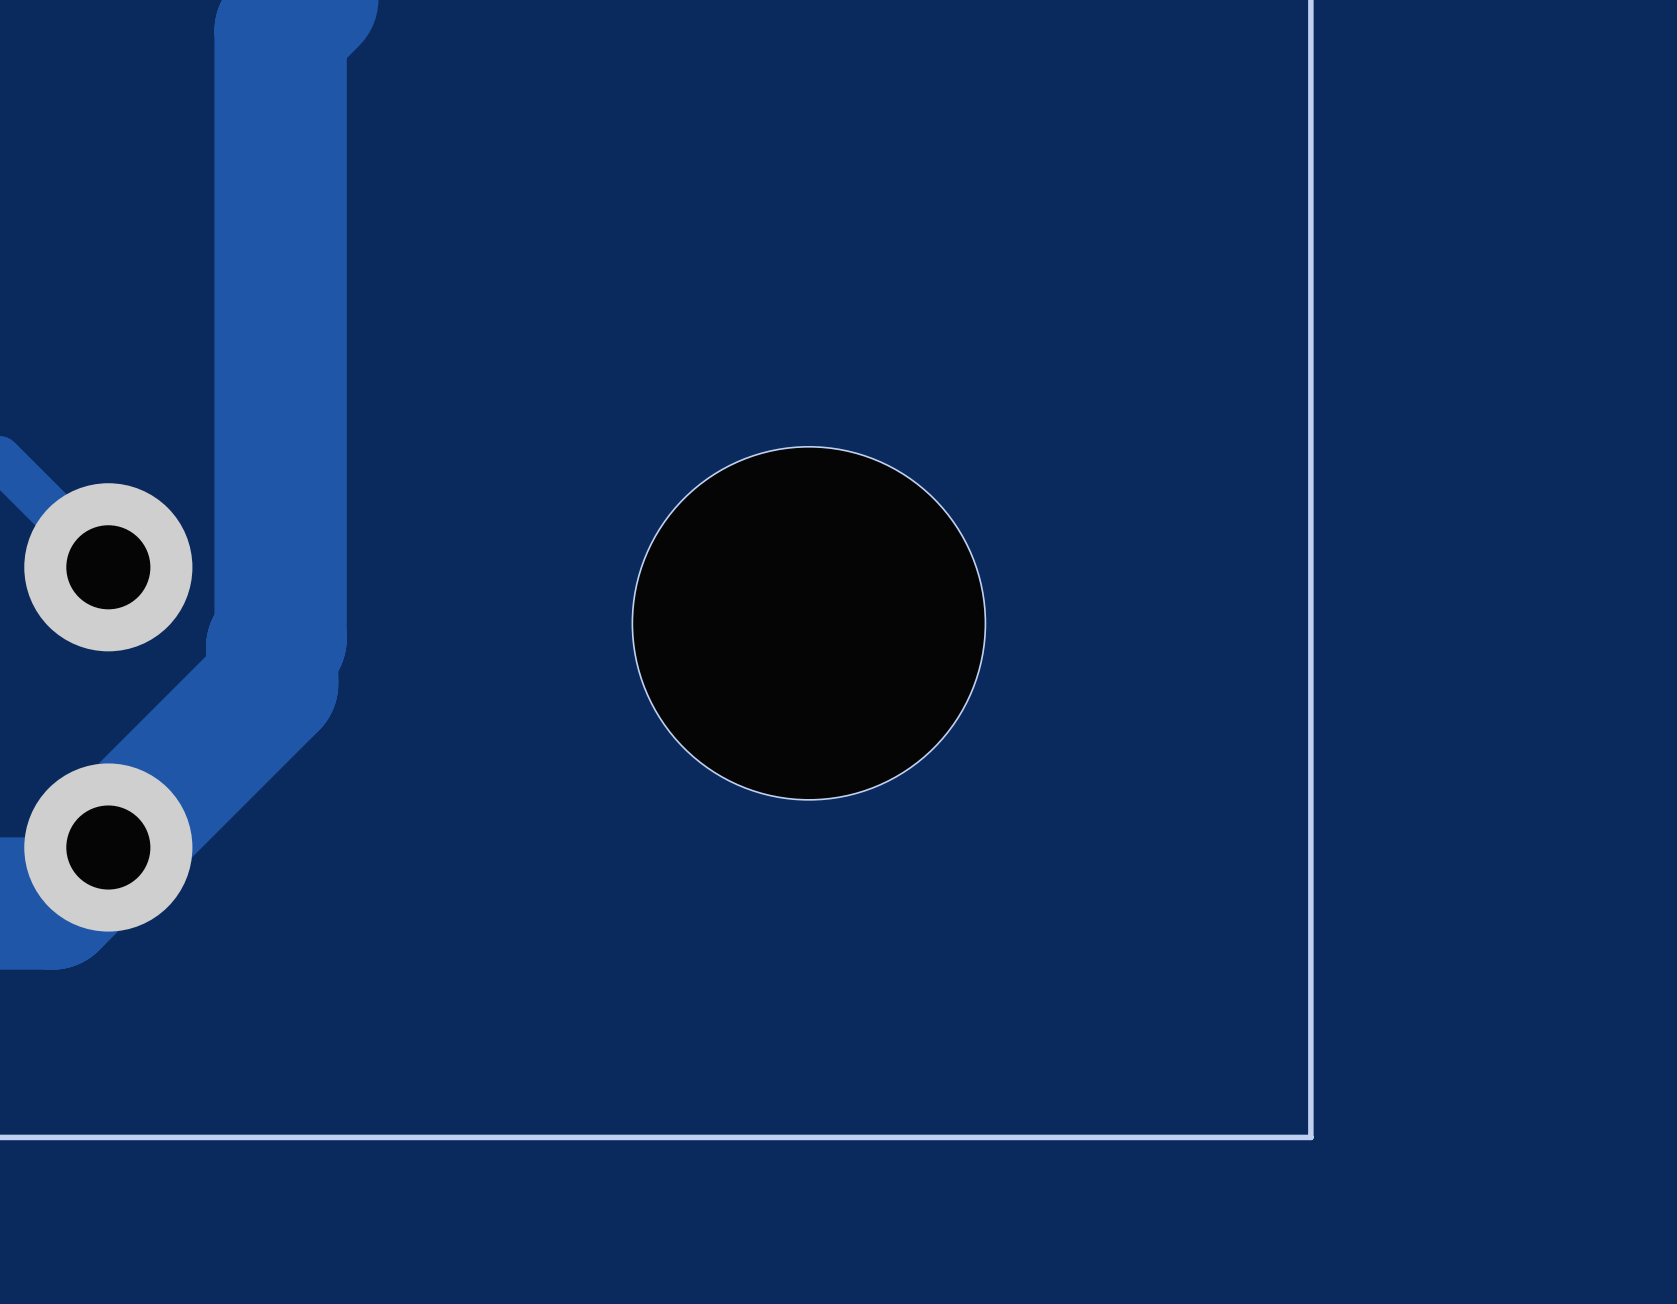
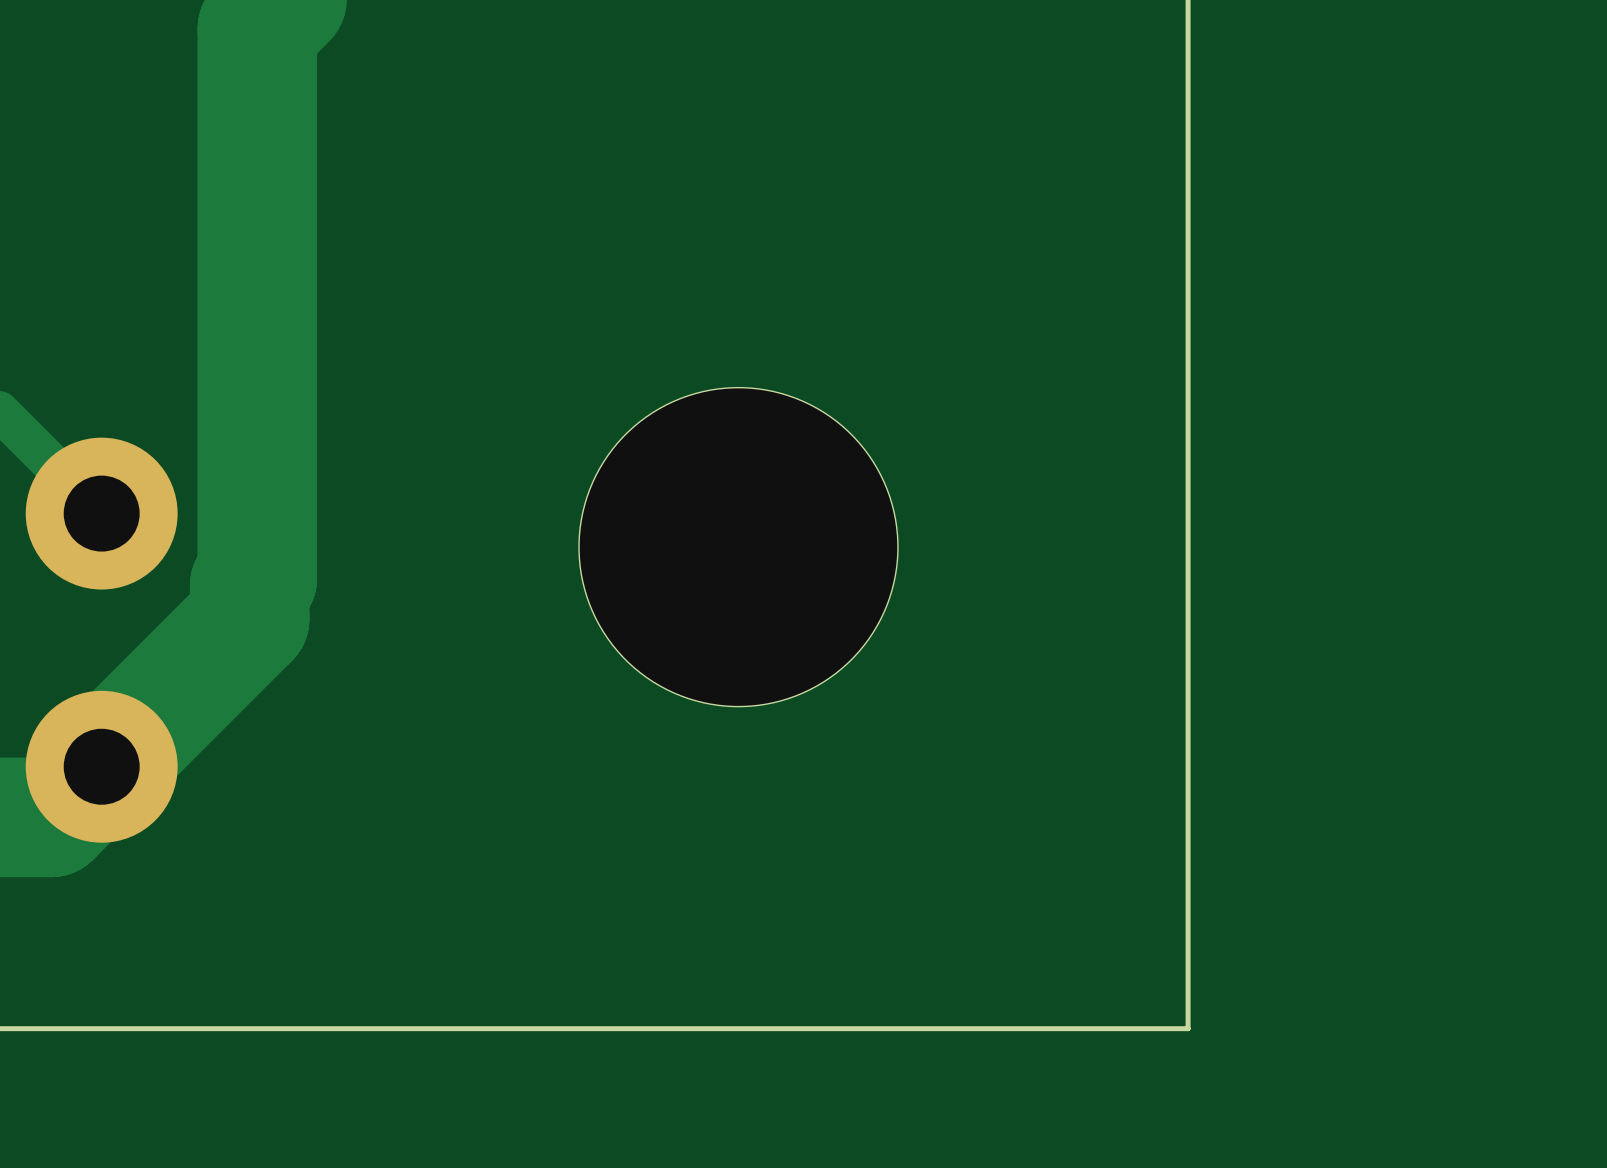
part position: (808, 623) -> (738, 547)

